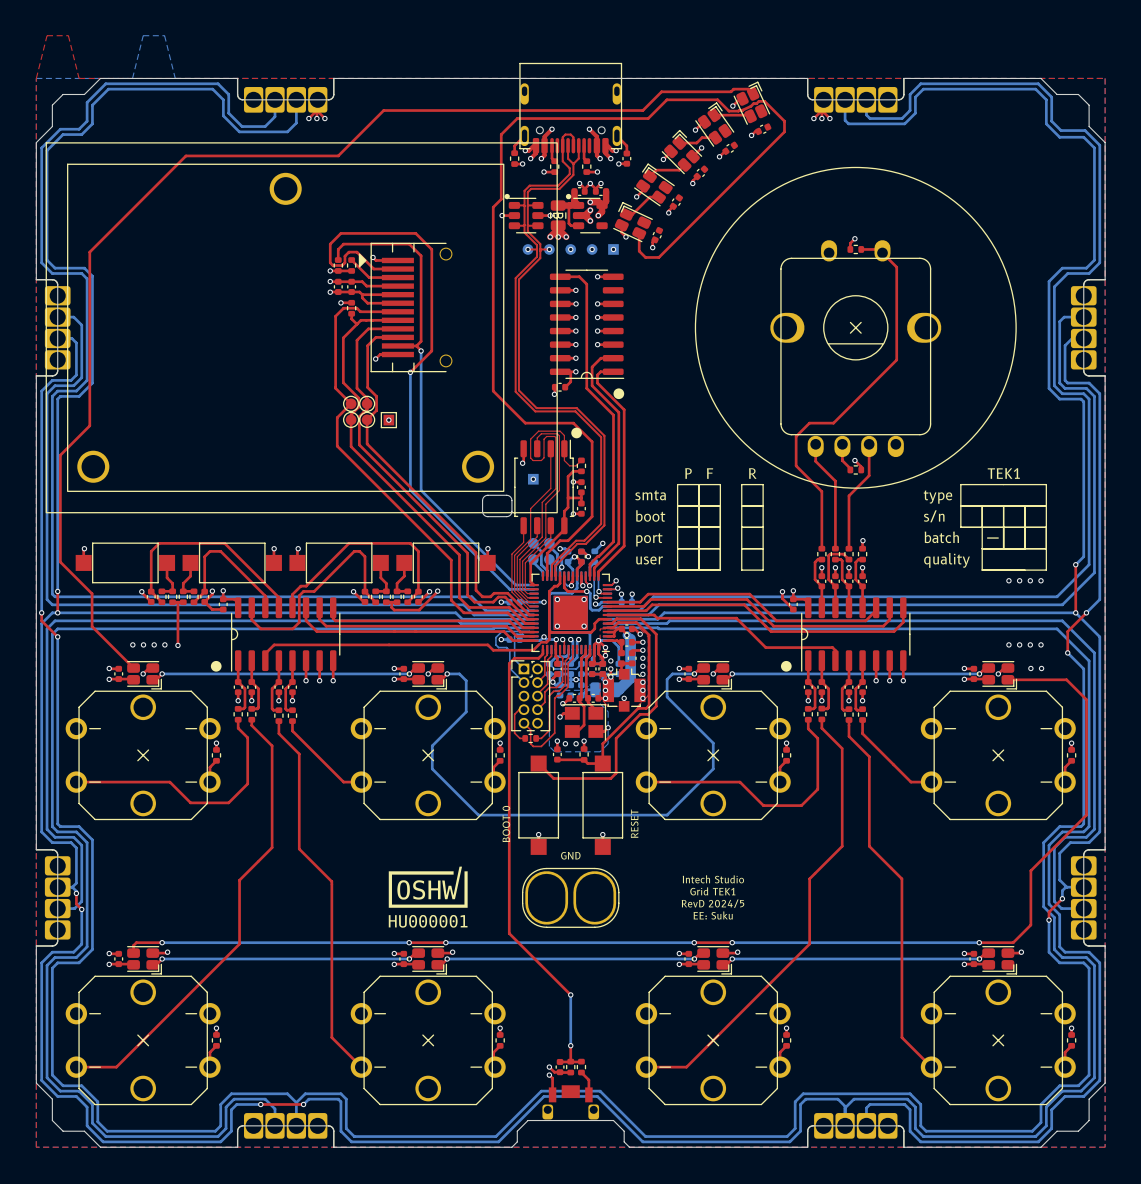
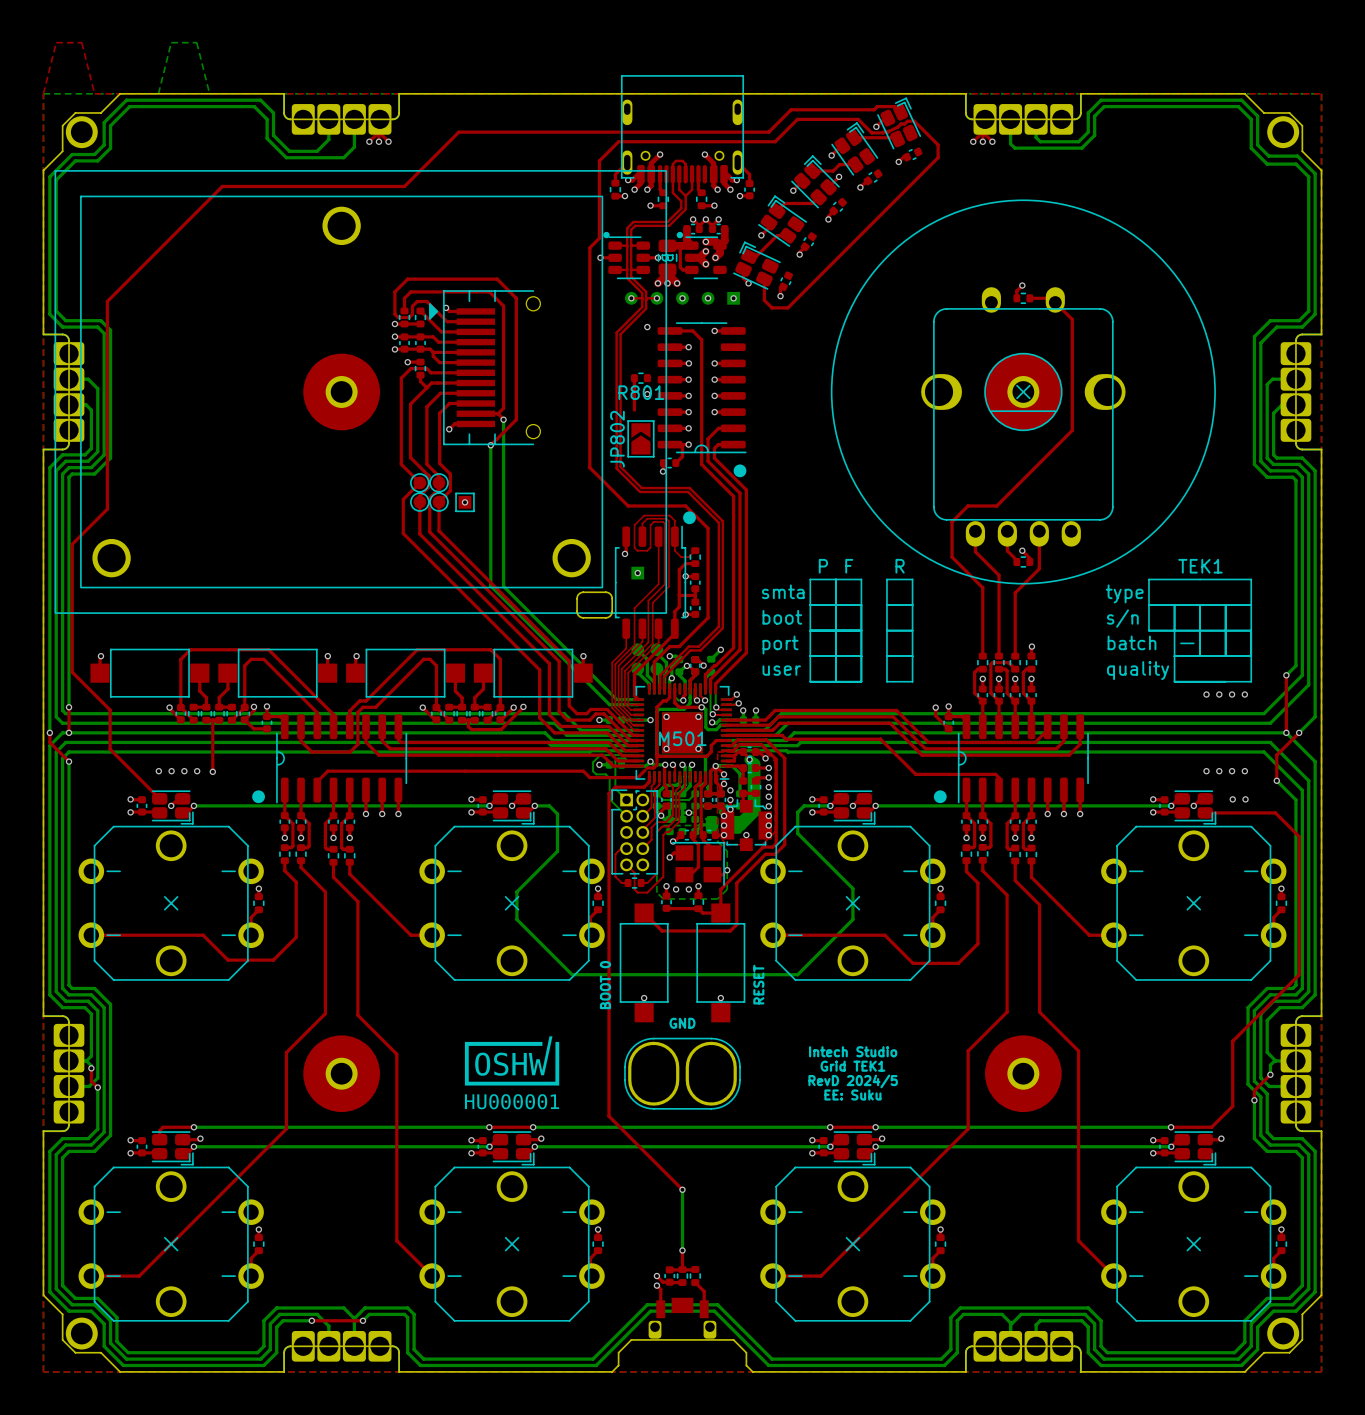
via: none -> (647, 327)
top track: none -> (634, 378) (634, 410)
R801: none -> (640, 378)
via: none -> (647, 394)
JP802: none -> (640, 438)
M501: none -> (682, 732)

